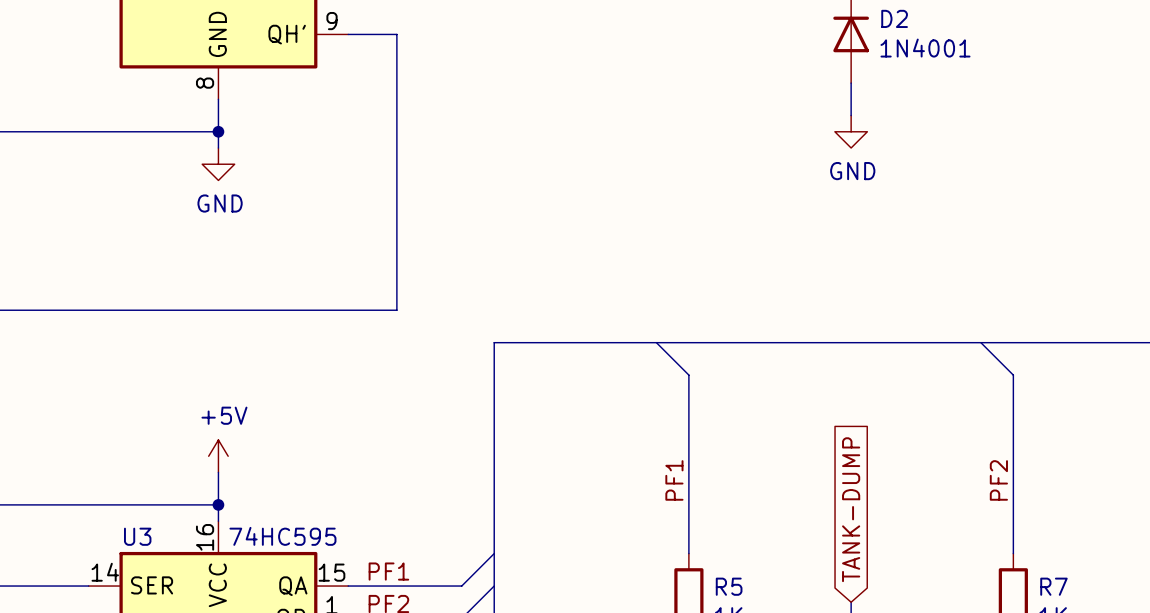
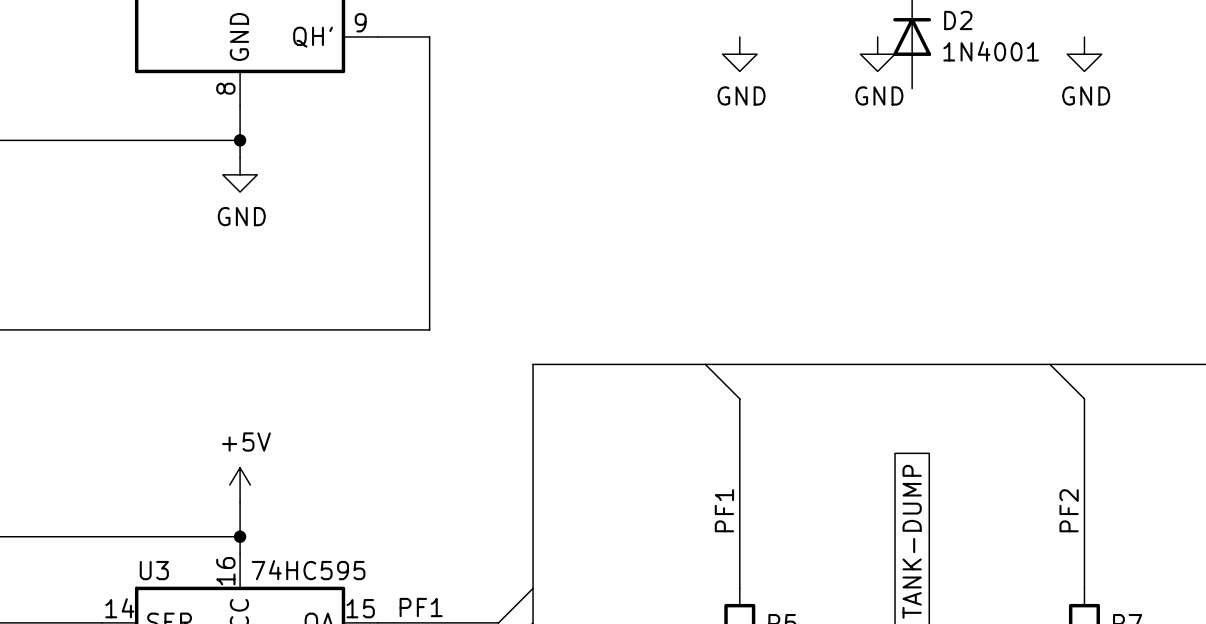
power symbol: none -> GND (739, 54)
power symbol: none -> GND (1084, 54)
wire: (851, 83) (851, 115) -> none
power symbol position: GND (851, 131) -> GND (877, 54)

